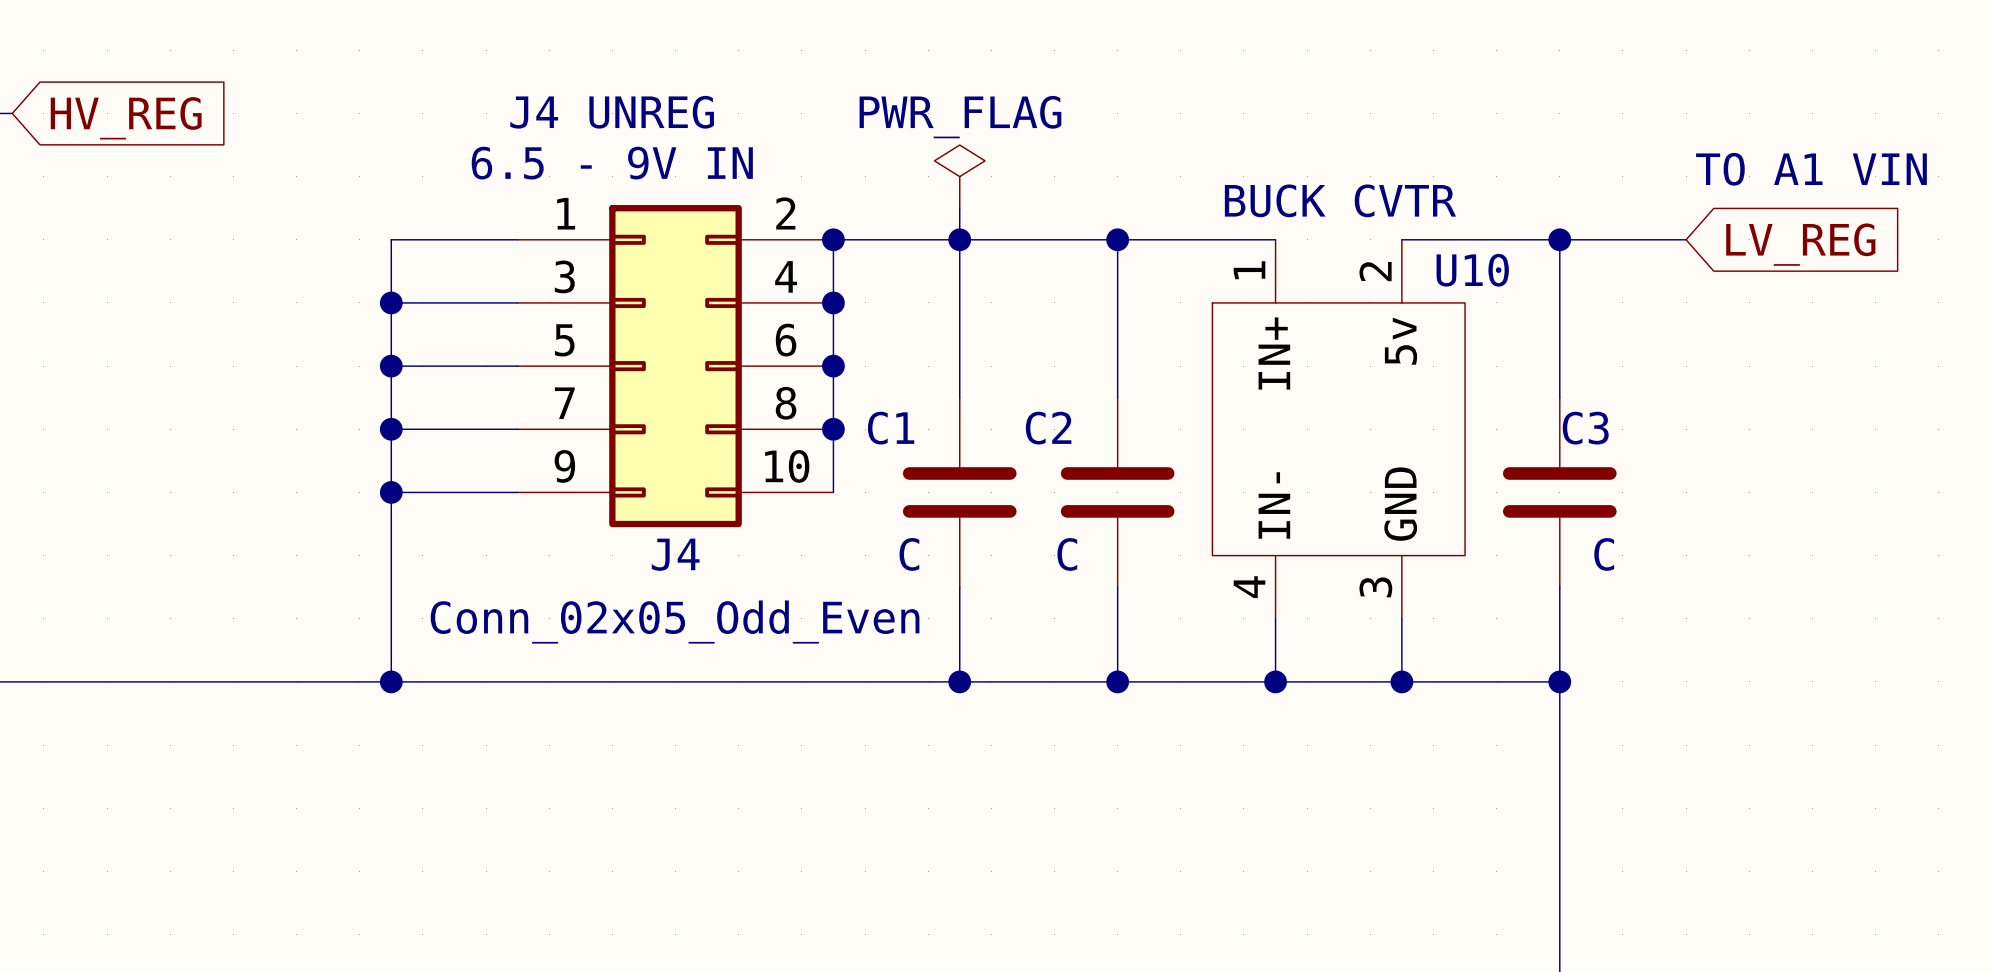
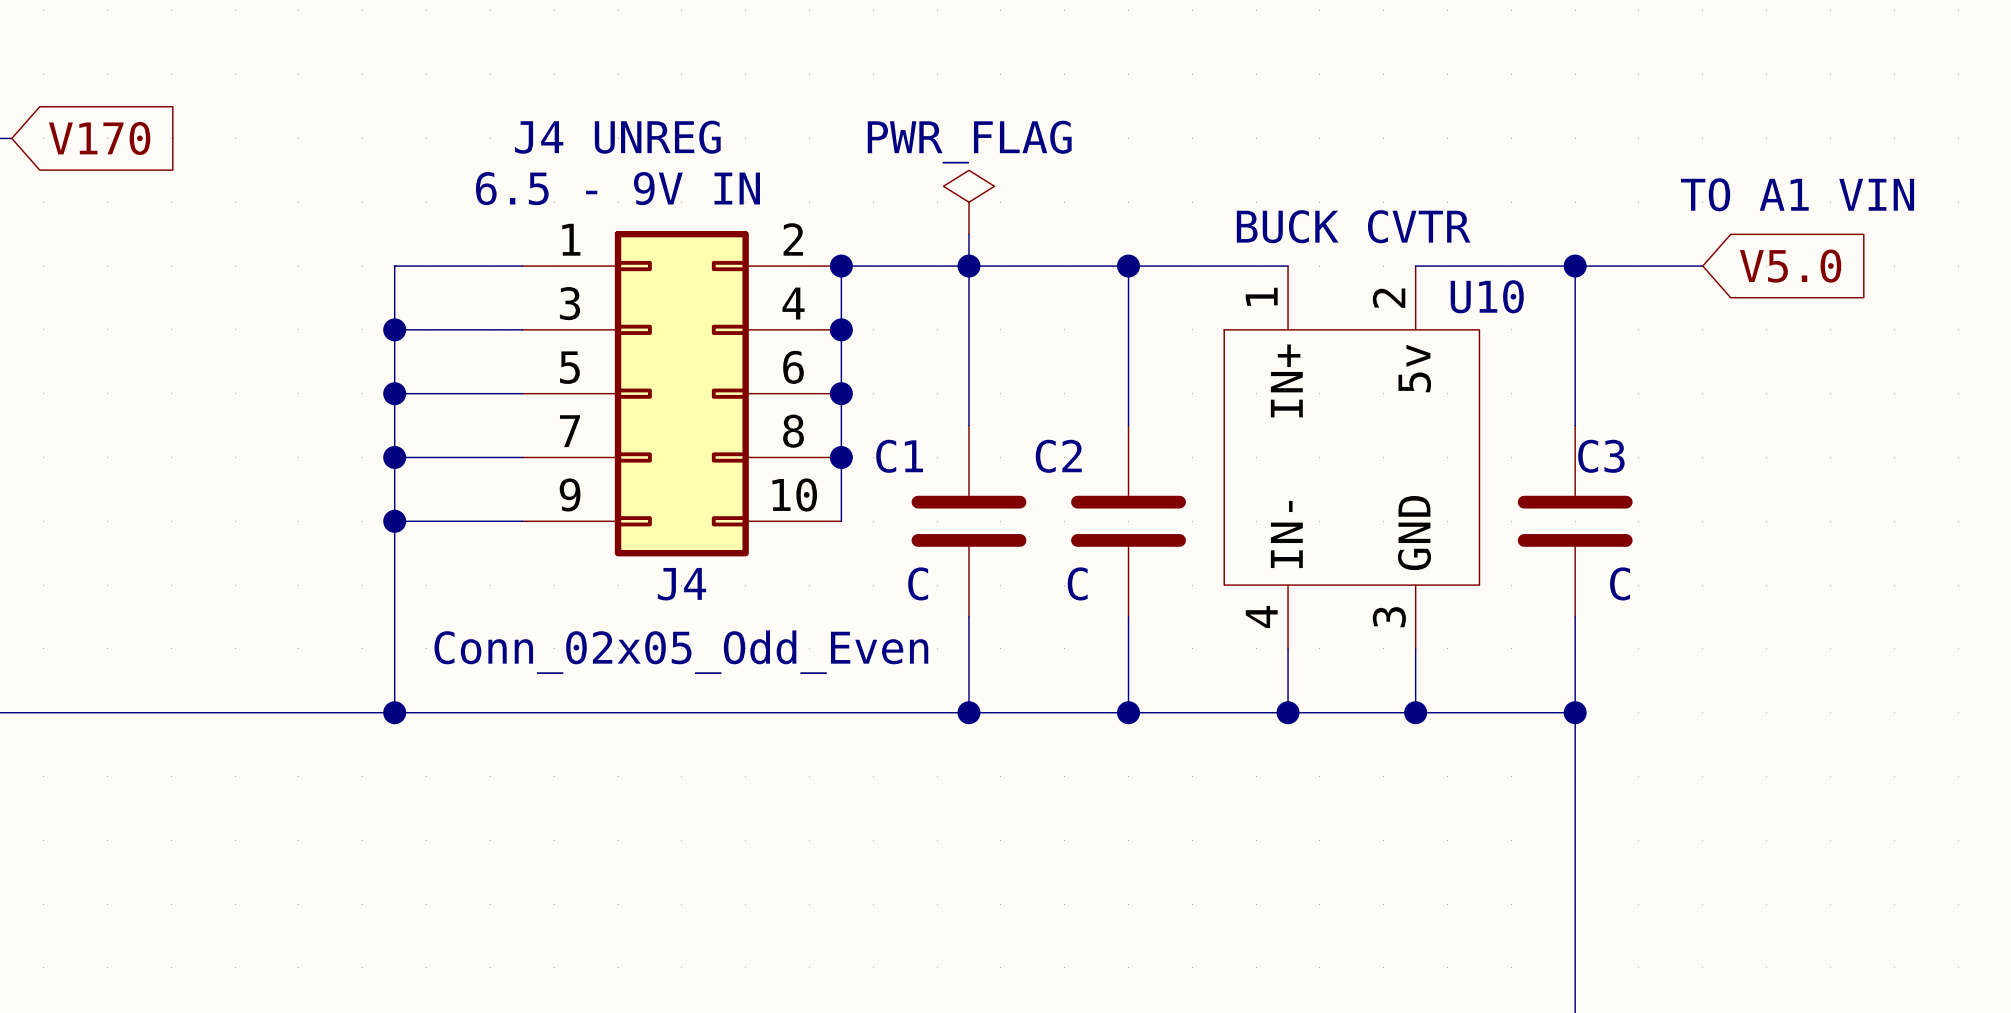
global label: HV_REG (126, 118) -> V170 (99, 138)
text position: TO A1 VIN (1811, 169) -> TO A1 VIN (1797, 194)
global label: LV_REG (1800, 244) -> V5.0 (1790, 266)

